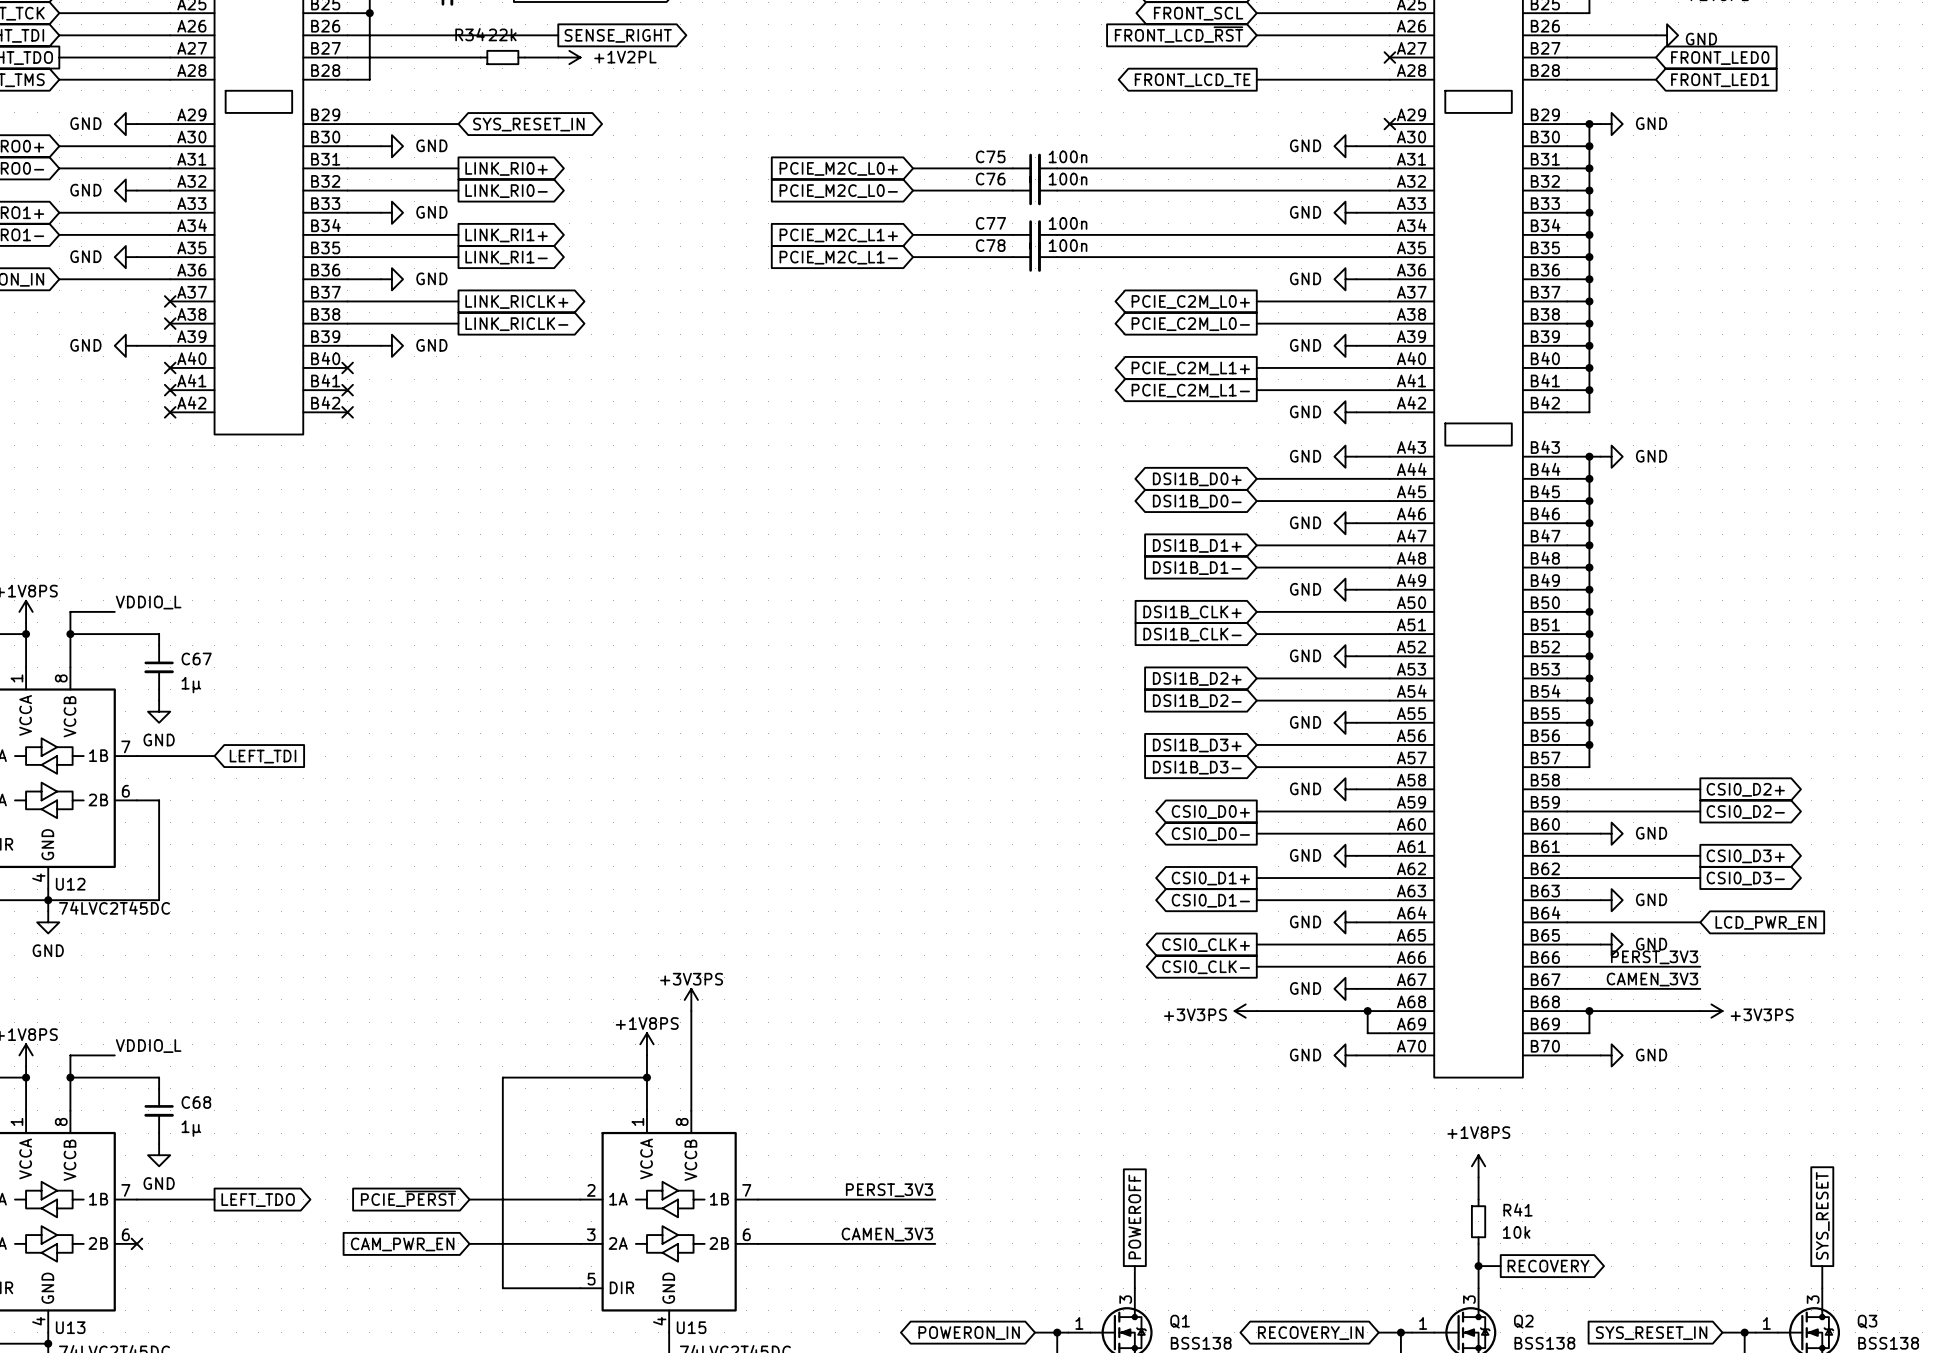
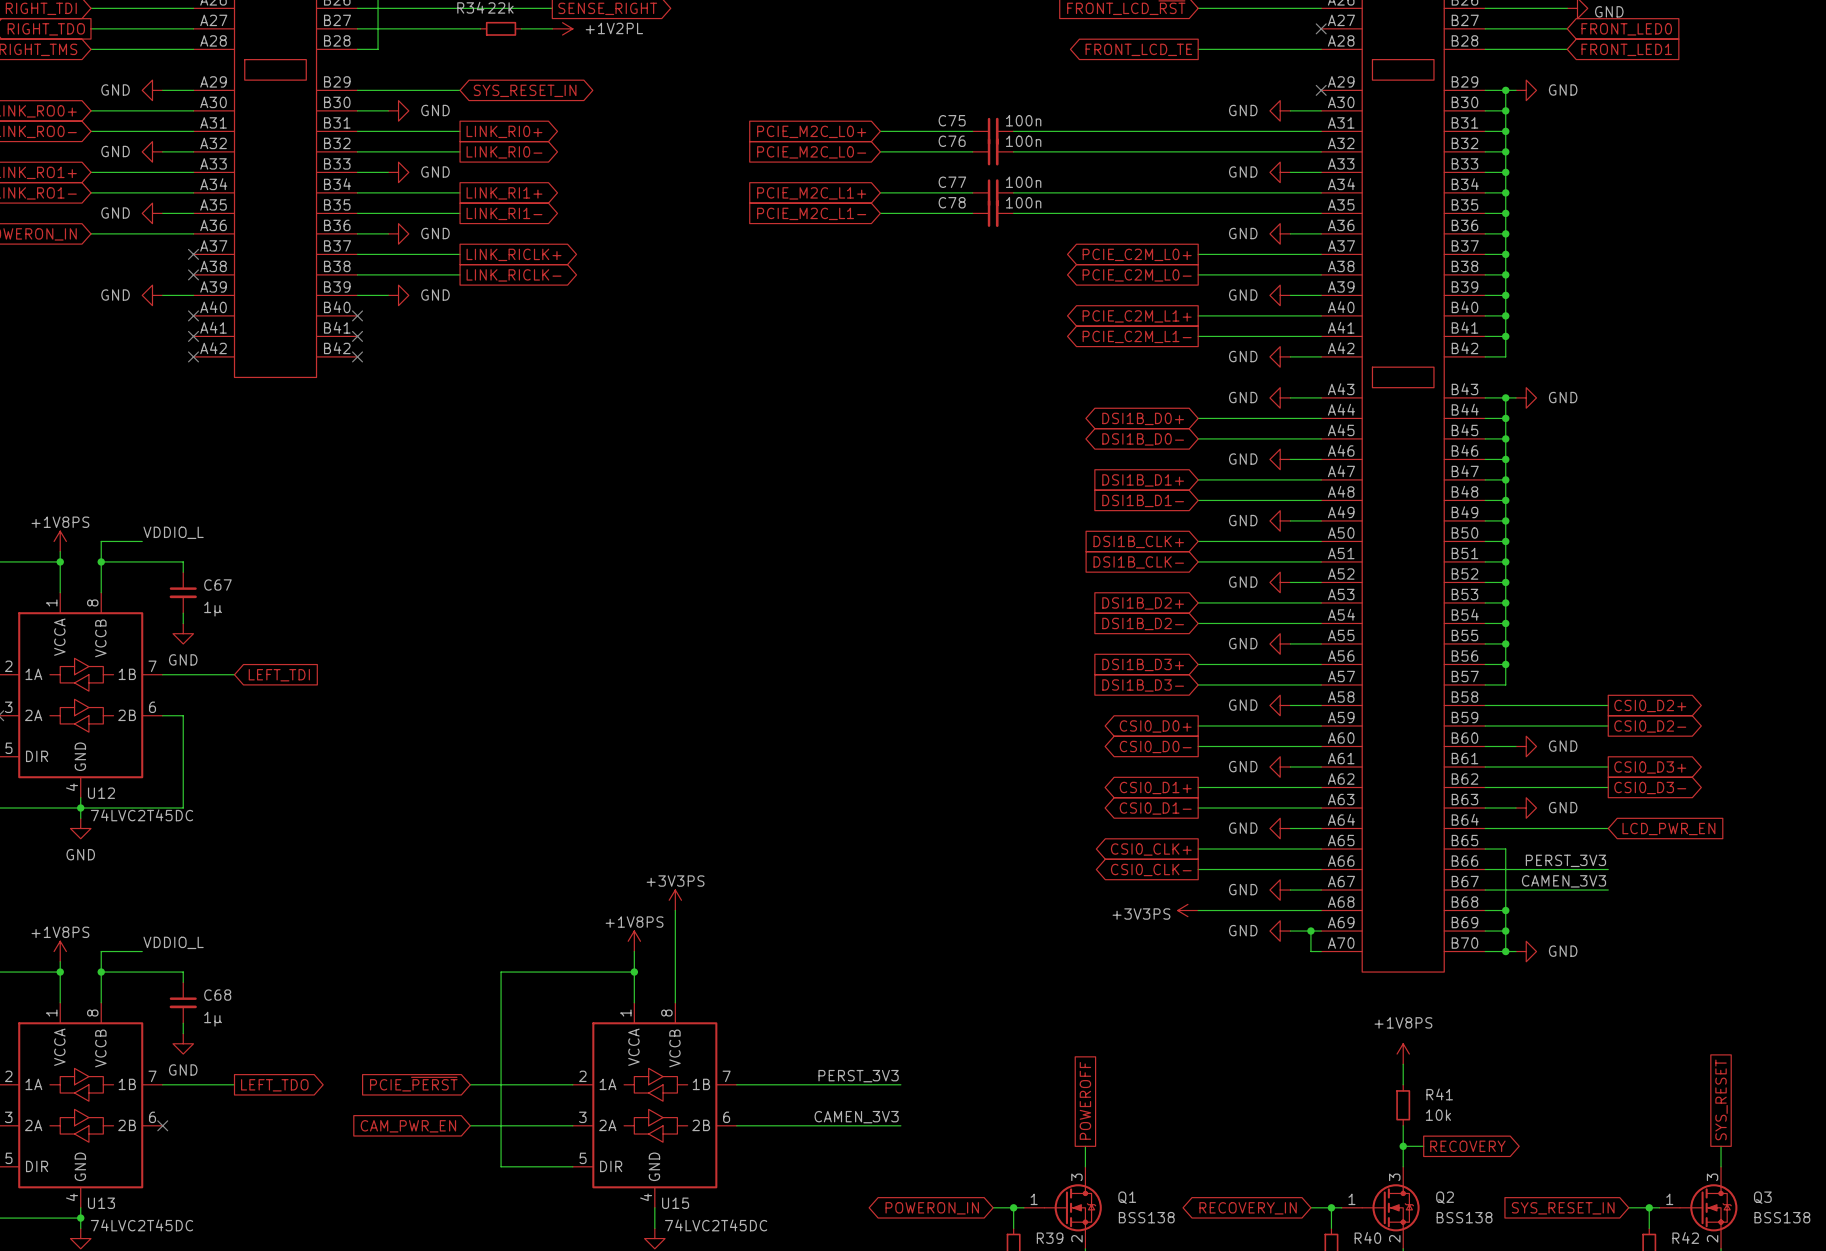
wire: (1589, 944) (1600, 944) -> (1505, 849) (1505, 910)
power symbol: GND (1611, 944) -> none
wire: (1367, 1011) (1367, 1033) -> (1290, 931) (1300, 931)
junction position: (1367, 1011) -> (1310, 931)
wire: (1589, 1011) (1700, 1011) -> none
power symbol: +3V3PS (1711, 1011) -> none
wire: none -> (1505, 931) (1505, 951)
junction: none -> (1505, 931)
power symbol position: GND (1345, 1055) -> GND (1280, 931)
wire: (1356, 1055) (1378, 1055) -> (1310, 931) (1310, 951)
junction: none -> (1505, 951)

